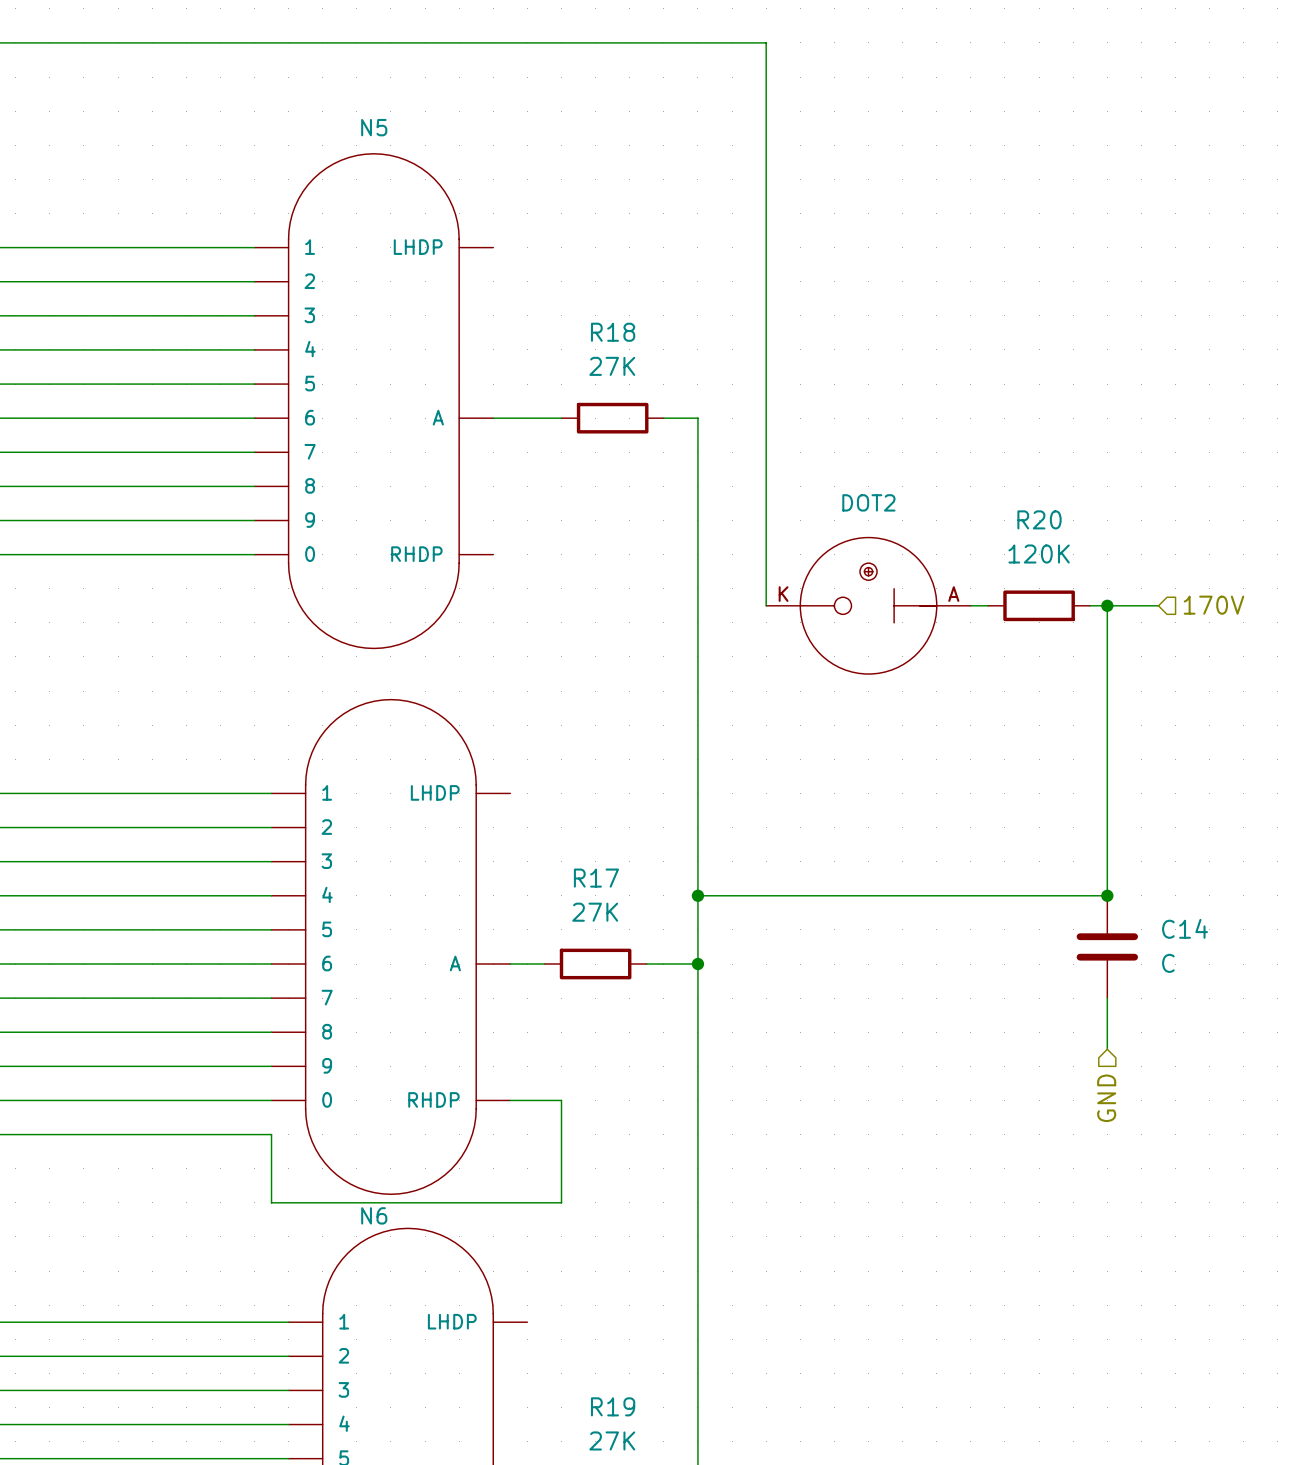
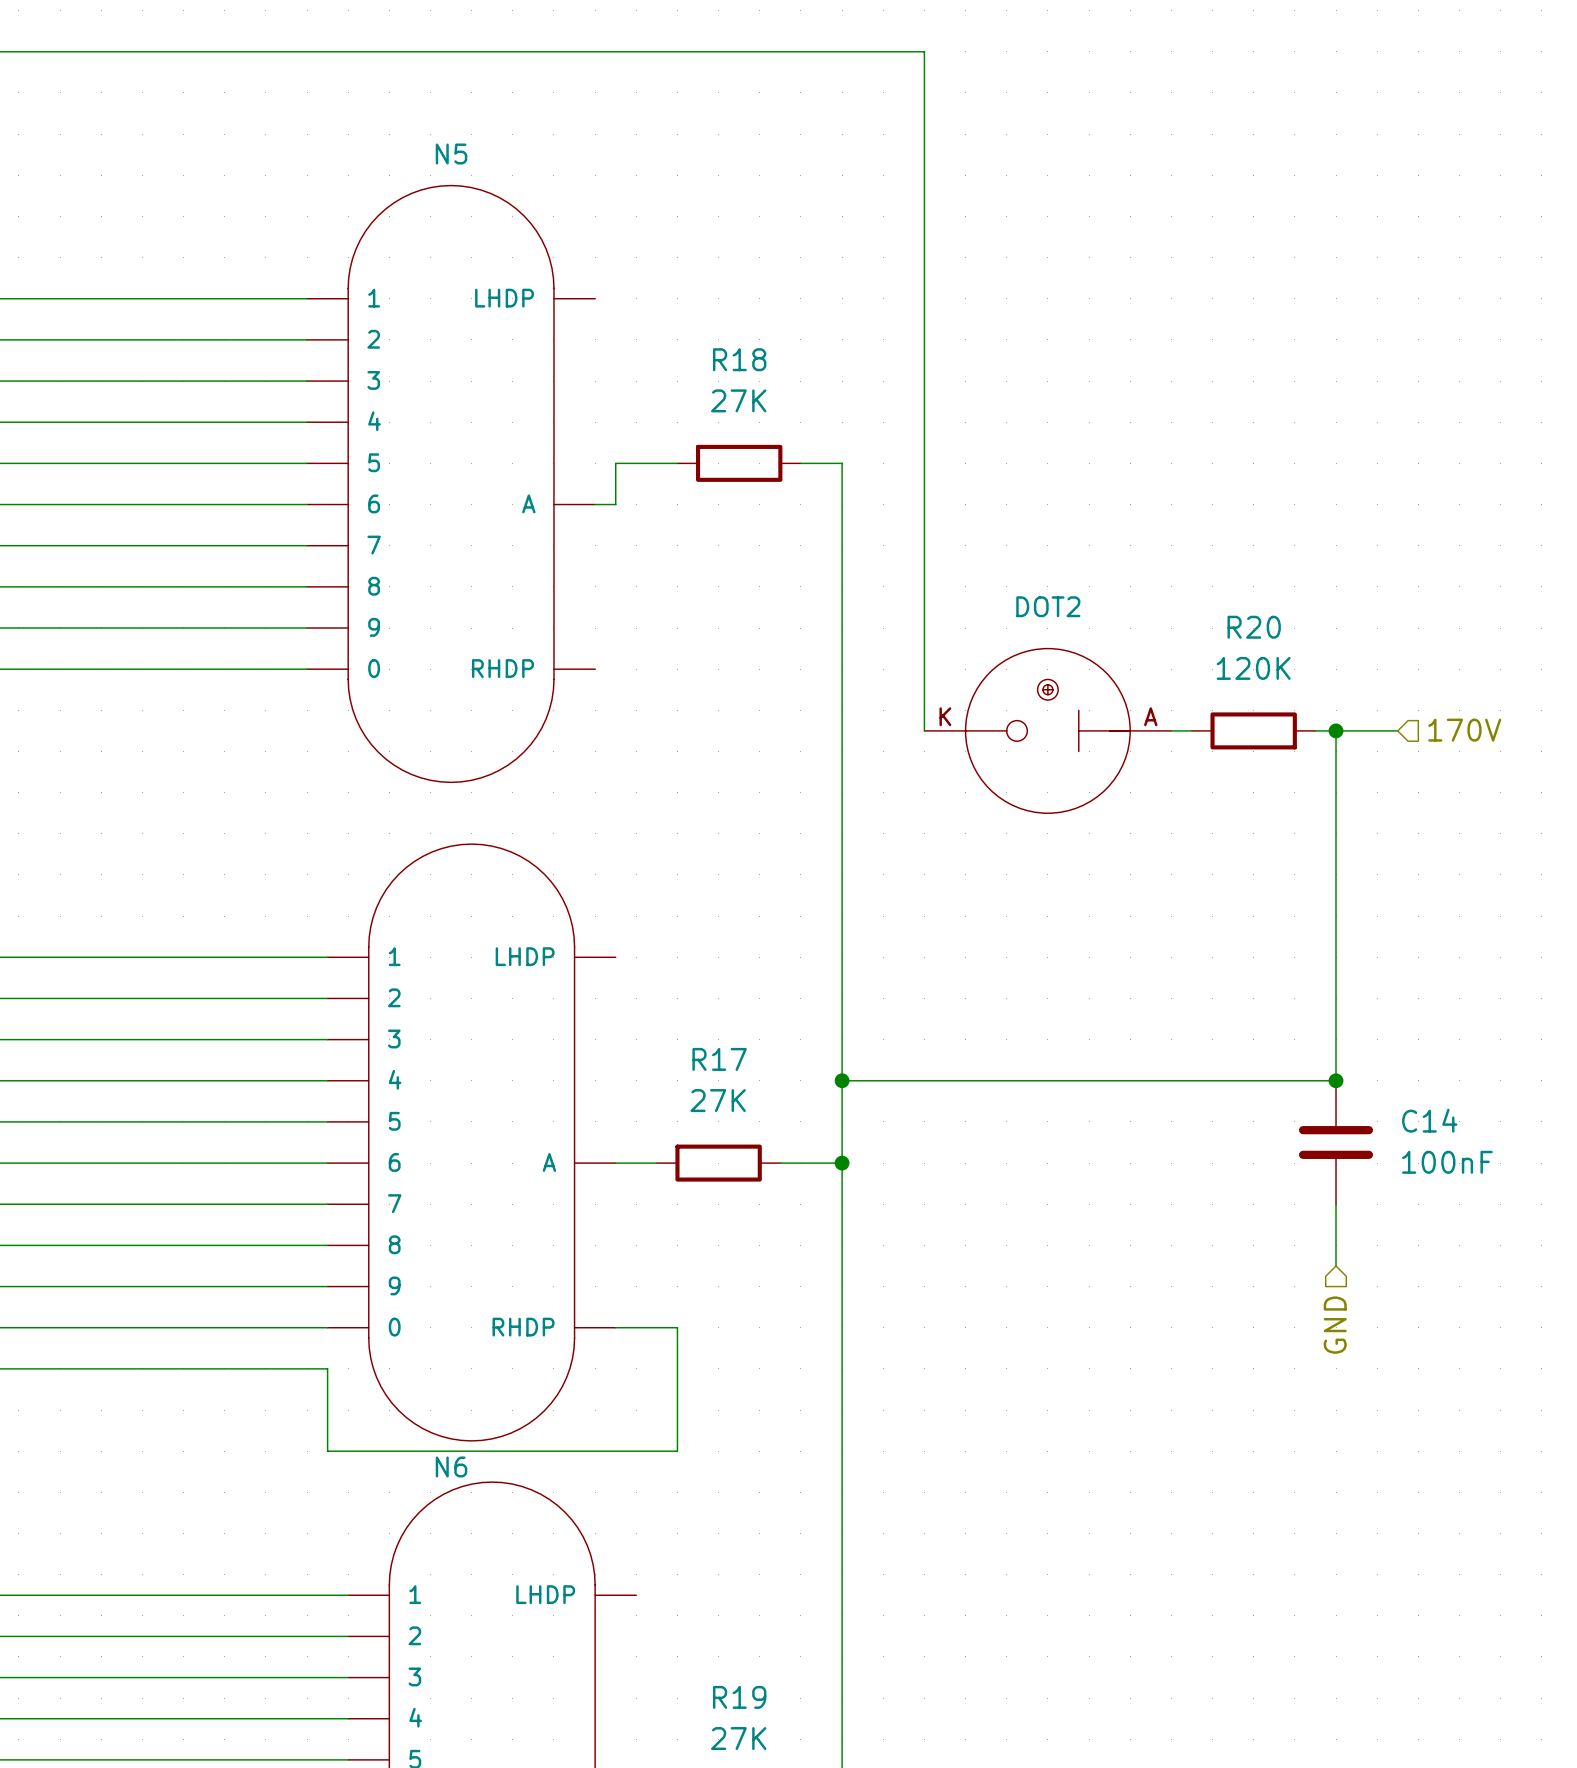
wire: (510, 418) (561, 418) -> (615, 504) (615, 463) (677, 463)
R18 position: (612, 418) -> (739, 463)
wire: (663, 418) (697, 418) -> (800, 463) (842, 463) (842, 504)
C14 value: C (1168, 963) -> 100nF (1447, 1162)

